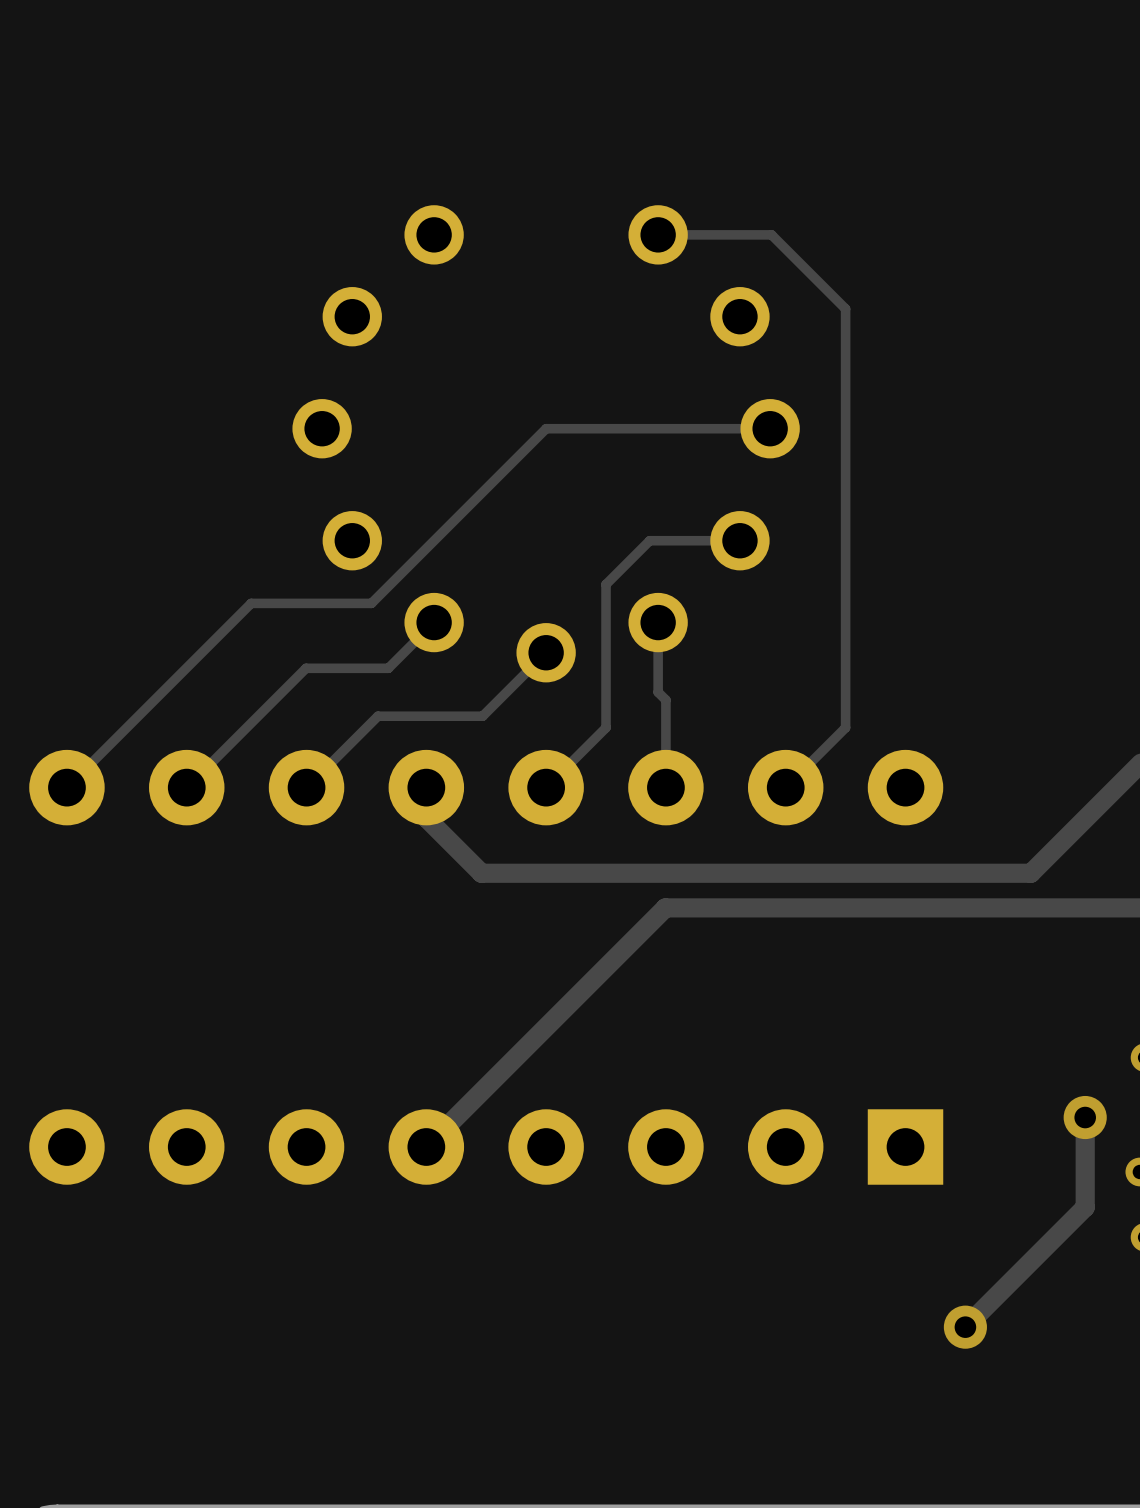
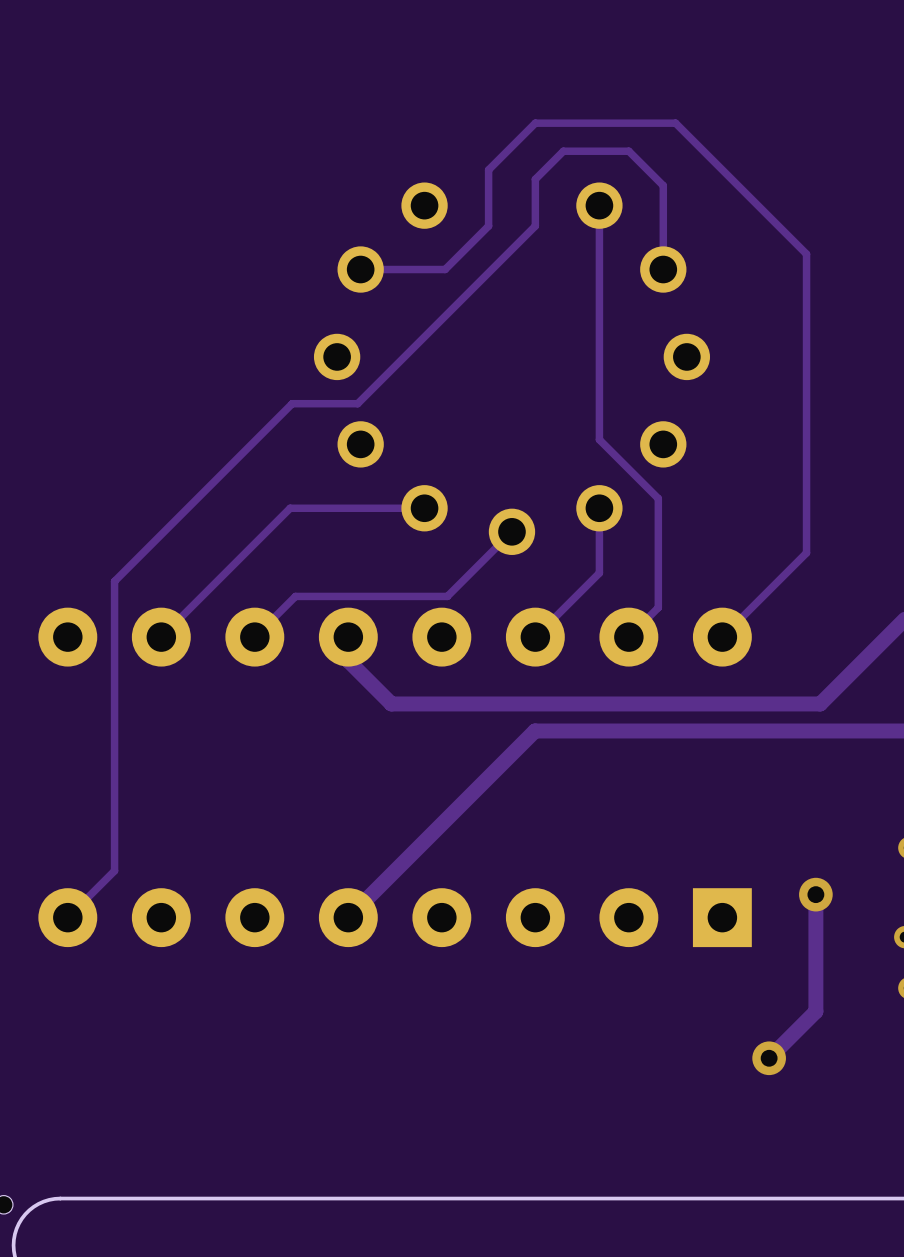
track: (658, 234) (771, 234) (845, 308) (845, 727) (823, 749) -> (599, 205) (599, 439) (658, 498) (658, 607)
track: none -> (360, 269) (445, 269) (488, 226) (488, 169) (535, 123) (675, 123) (806, 254) (806, 552) (722, 637)
track: none -> (663, 269) (663, 185) (628, 151) (563, 151) (535, 179) (535, 226) (357, 403) (292, 403) (114, 581) (114, 870) (67, 917)
track: (770, 428) (546, 428) (371, 603) (251, 603) (66, 787) -> none
part position: (546, 443) -> (511, 368)
track: (739, 540) (649, 540) (606, 584) (606, 727) (546, 787) -> none
track: (434, 622) (388, 668) (306, 668) -> (424, 508) (290, 508) (254, 543)
track: (658, 622) (658, 692) (665, 700) (665, 787) -> (599, 508) (599, 573) (535, 637)
track: (546, 652) (482, 716) (377, 716) (358, 735) -> (511, 531) (447, 596) (295, 596)
track: (1085, 1117) (1085, 1207) (1025, 1267) -> (815, 894) (815, 1011)
via position: (1085, 1117) -> (815, 894)

